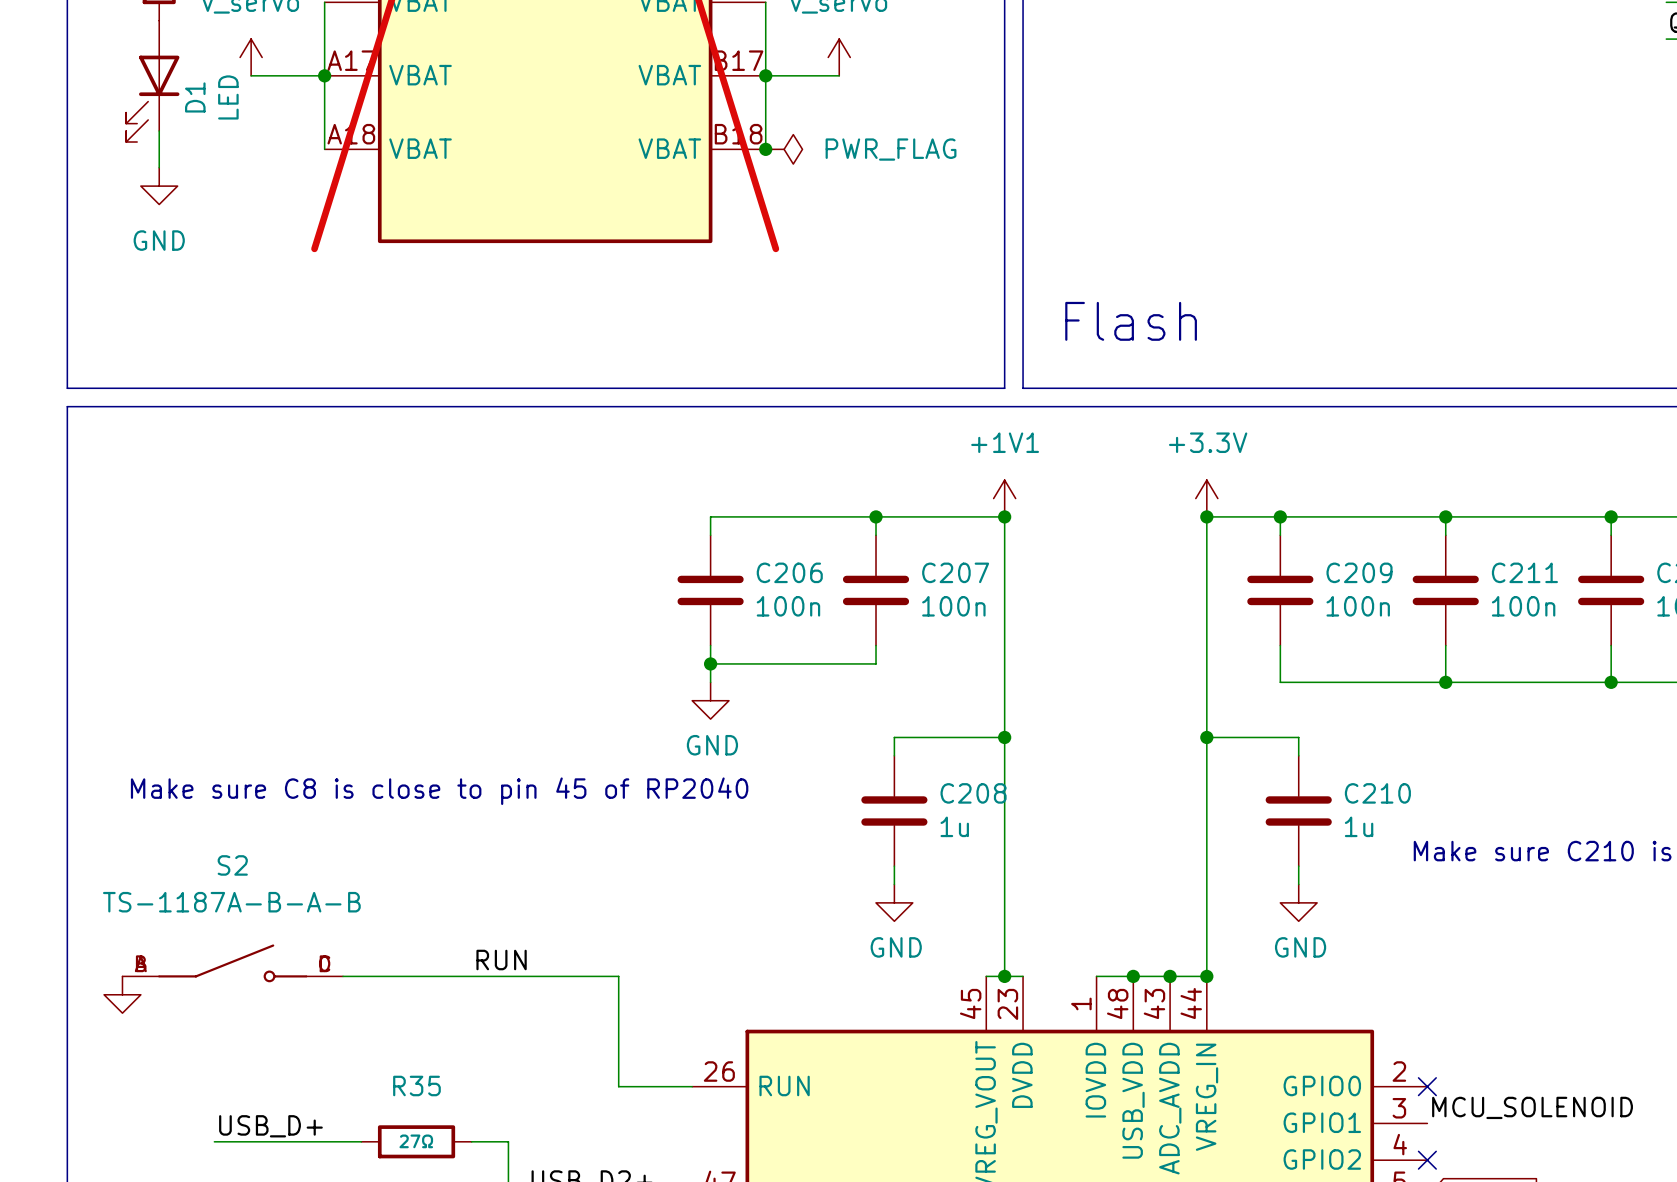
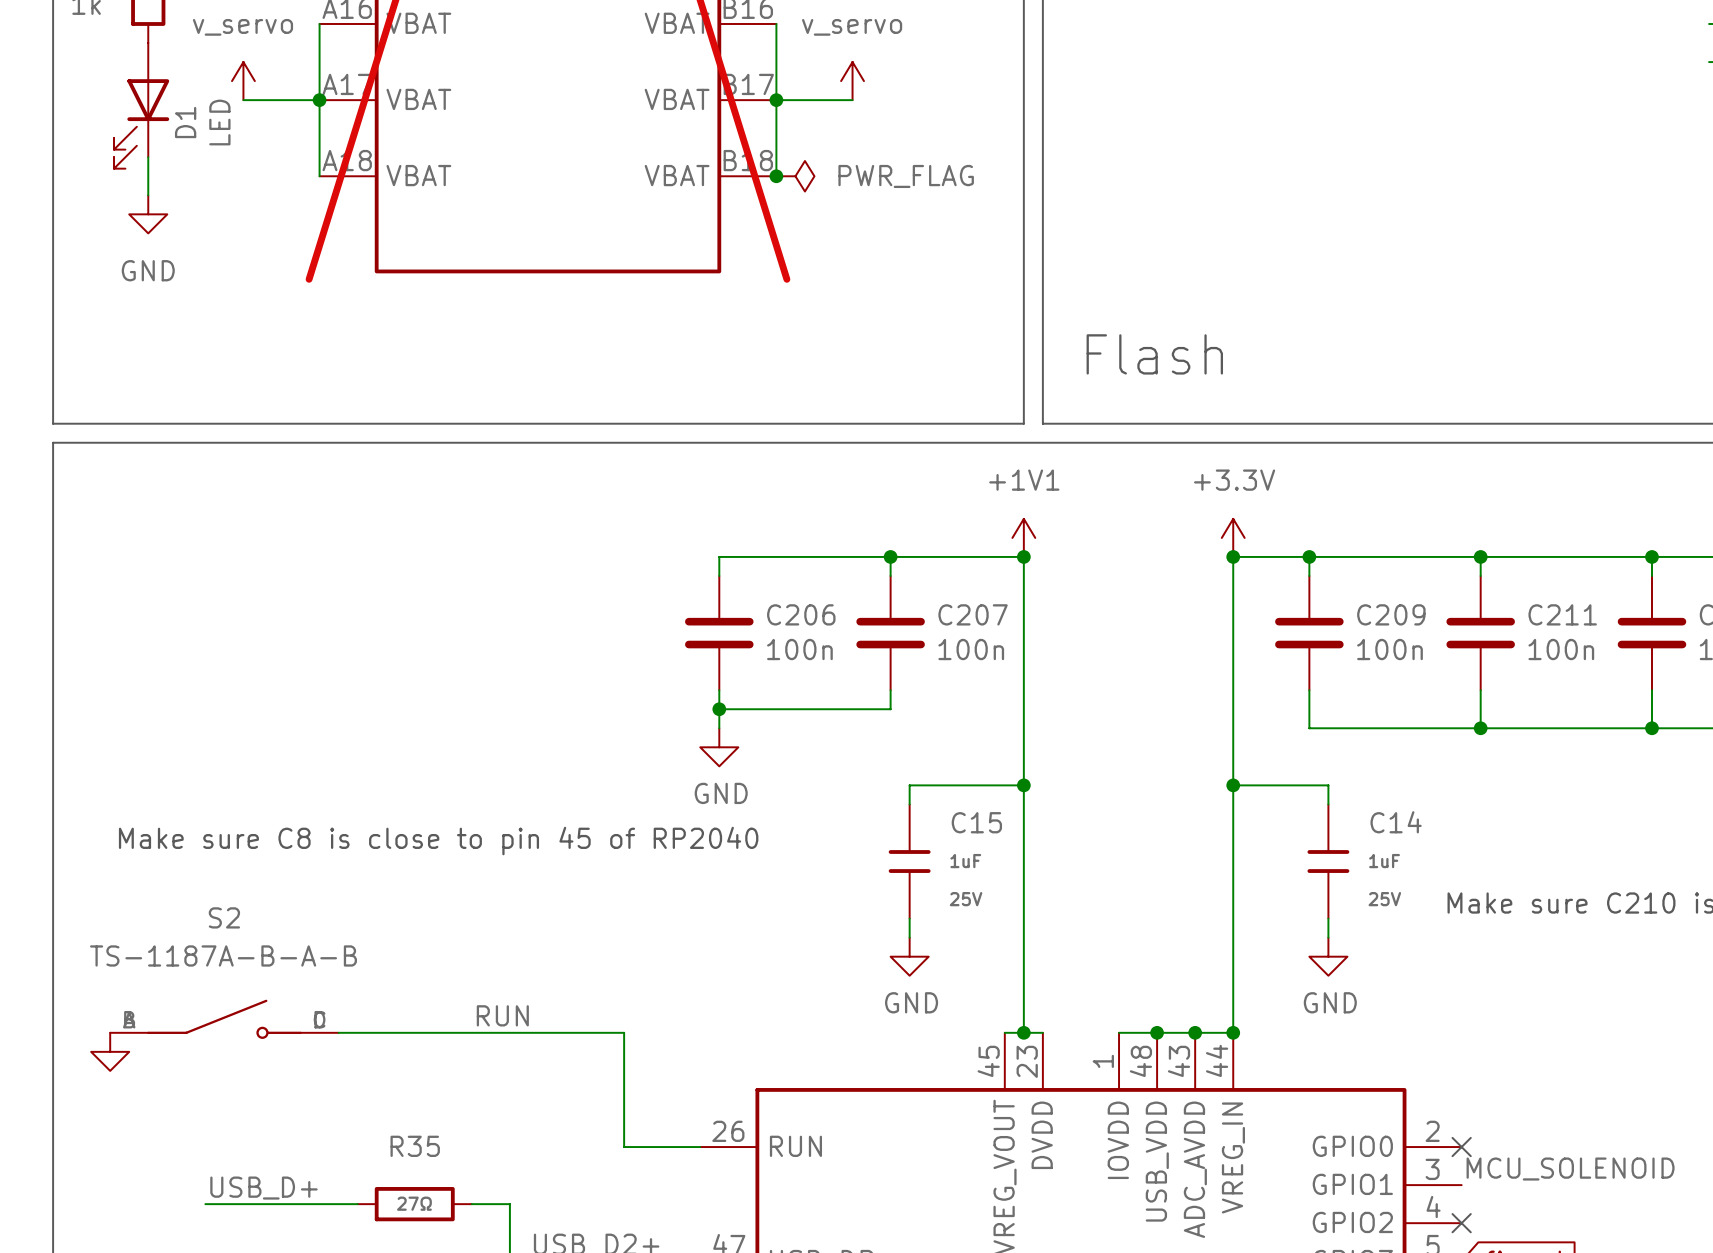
C208: 1u (894, 810) -> none
C15: none -> 1uF (909, 861)
C210: 1u (1298, 810) -> none
C14: none -> 1uF (1328, 861)

